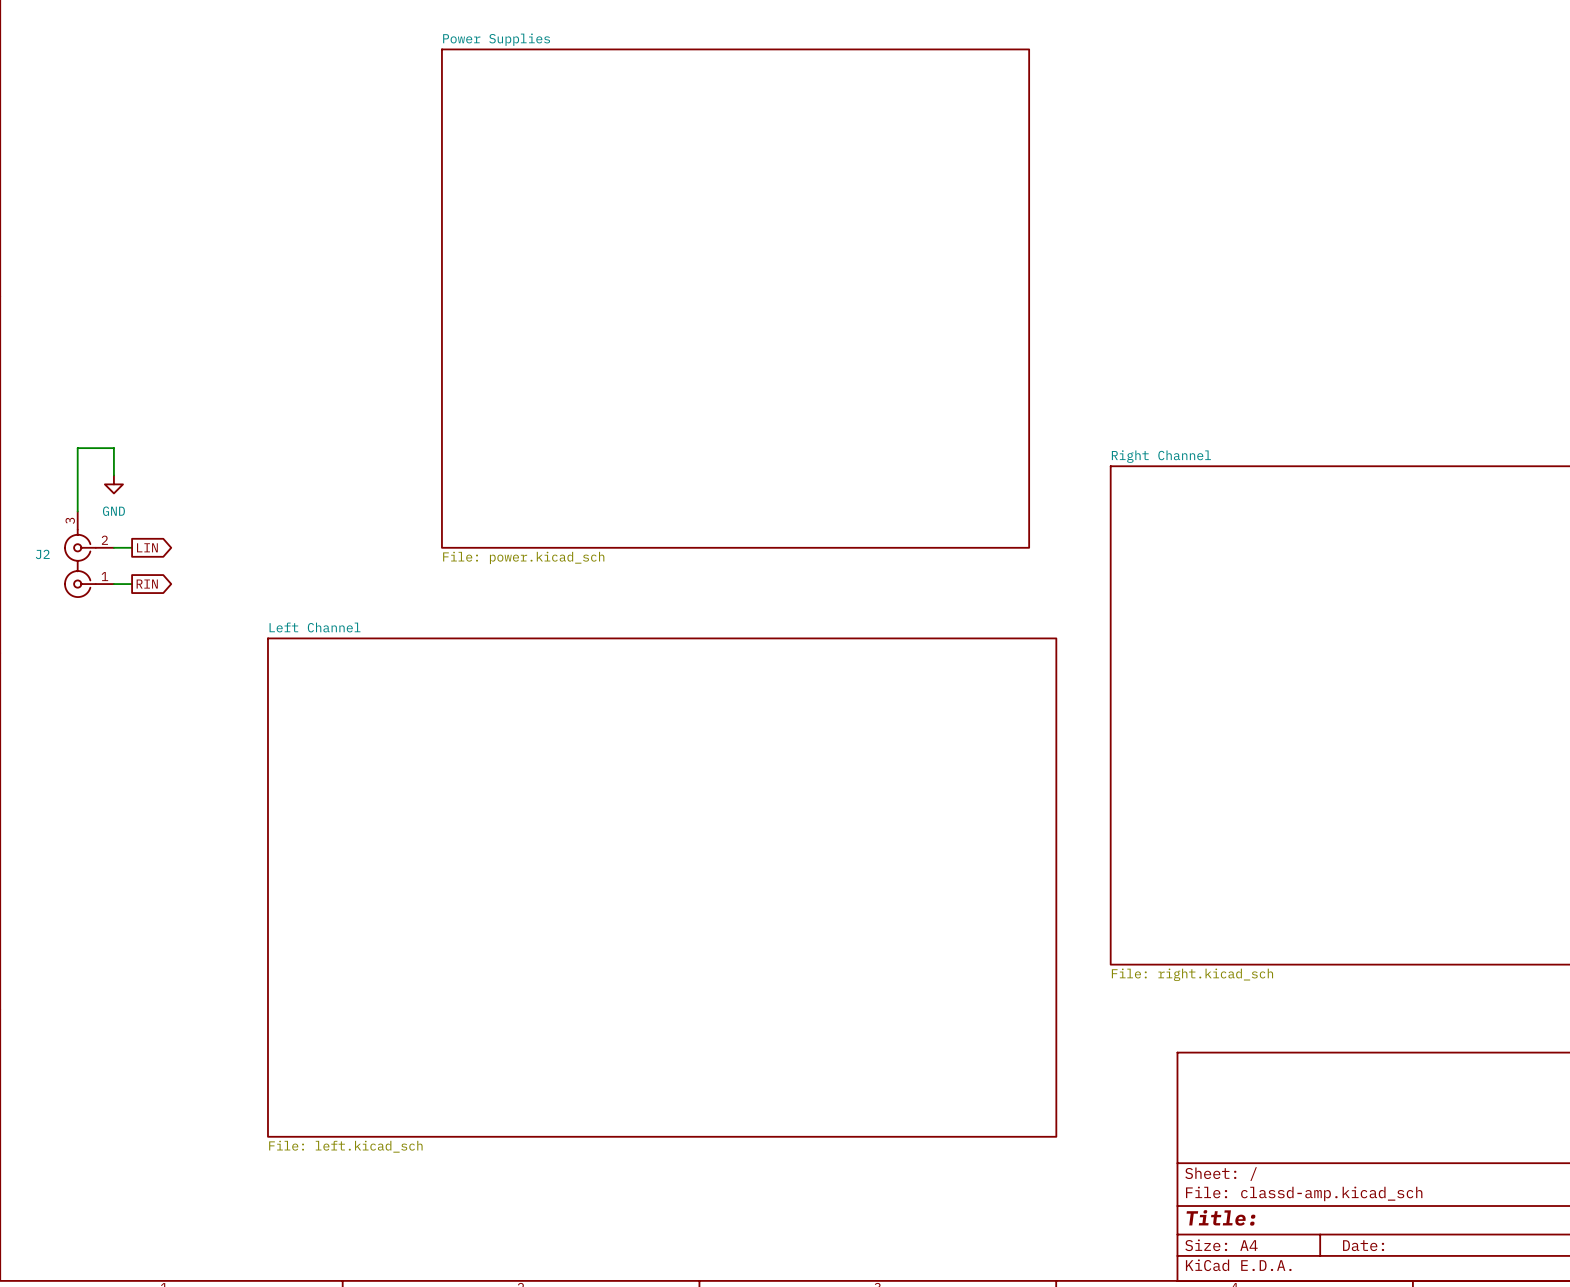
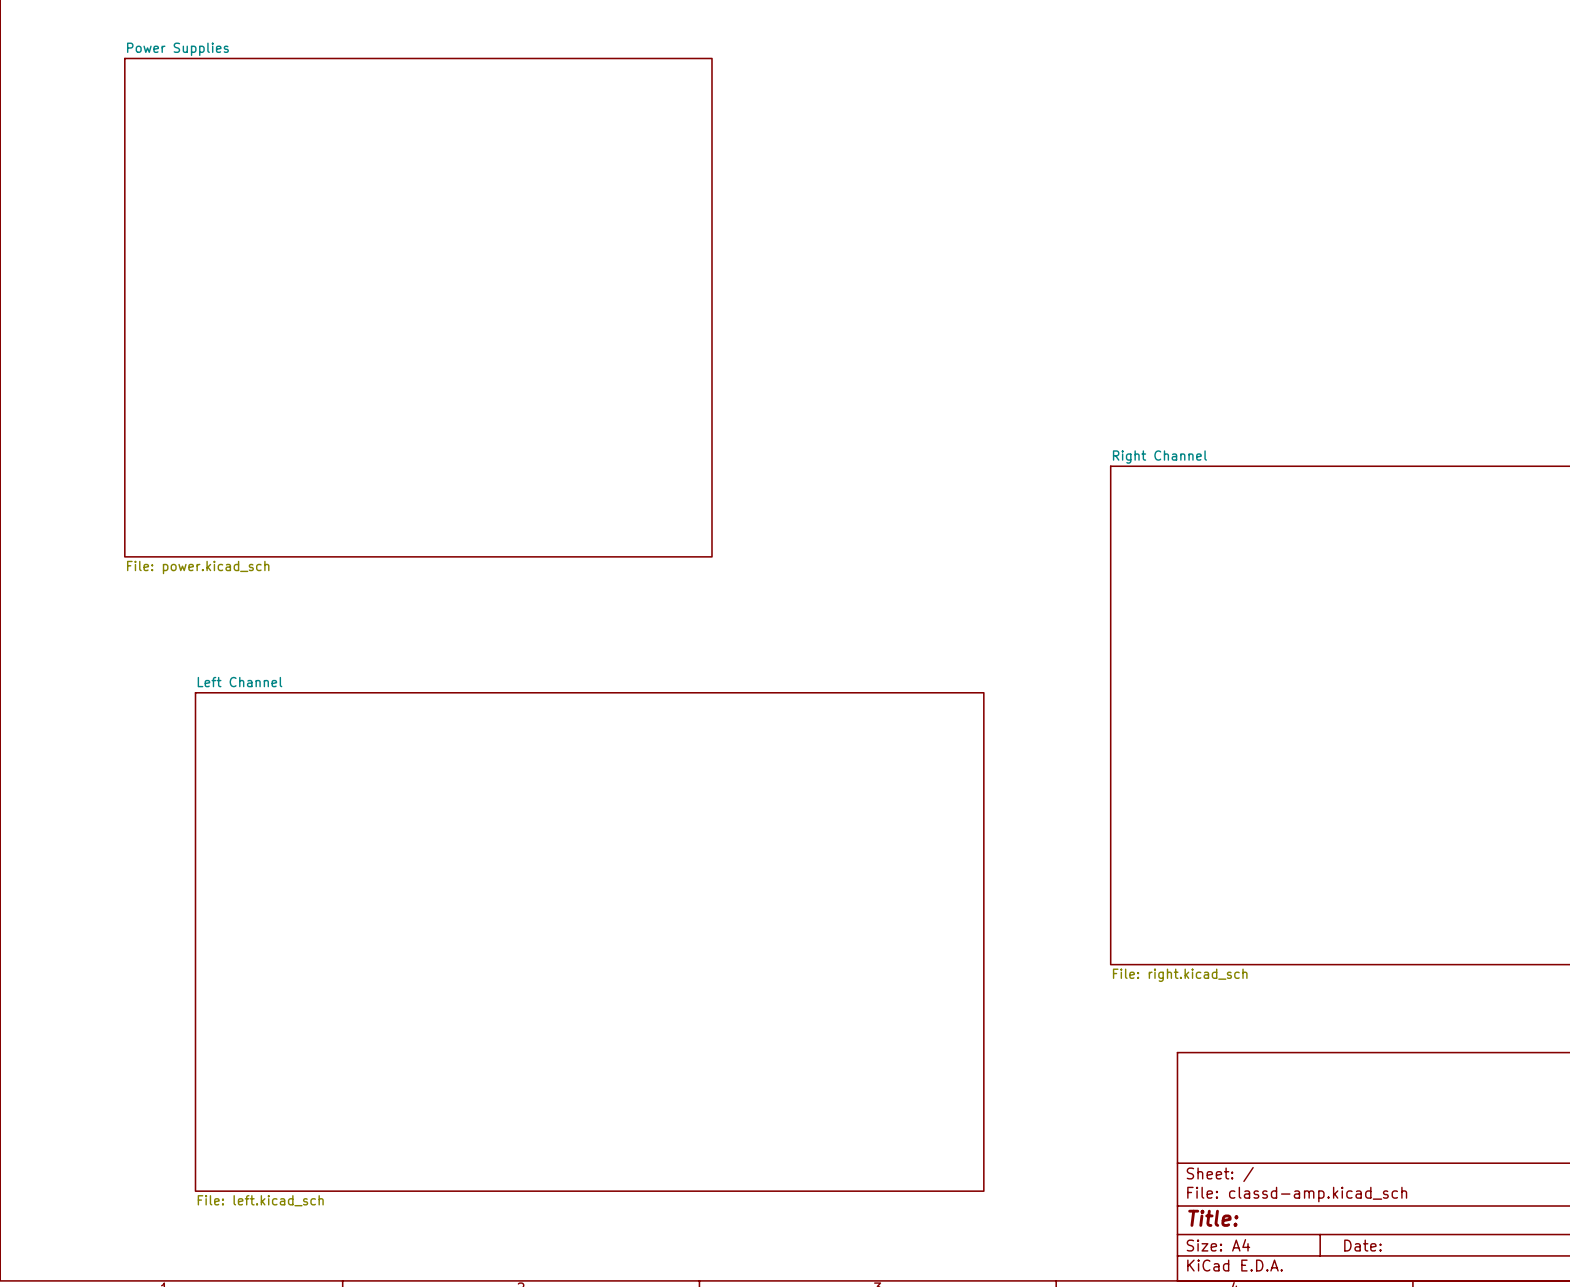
sheet Power Supplies: File: power.kicad_sch (735, 298) -> none
sheet Power Supplies: none -> File: power.kicad_sch (418, 307)
wire: (113, 475) (113, 448) (77, 448) (77, 511) -> none
power symbol: GND (113, 484) -> none
wire: (113, 547) (132, 547) -> none
global label: LIN (147, 547) -> none
J2: (89, 554) -> none
wire: (113, 584) (132, 584) -> none
global label: RIN (147, 584) -> none
sheet Left Channel position: (662, 887) -> (589, 941)

